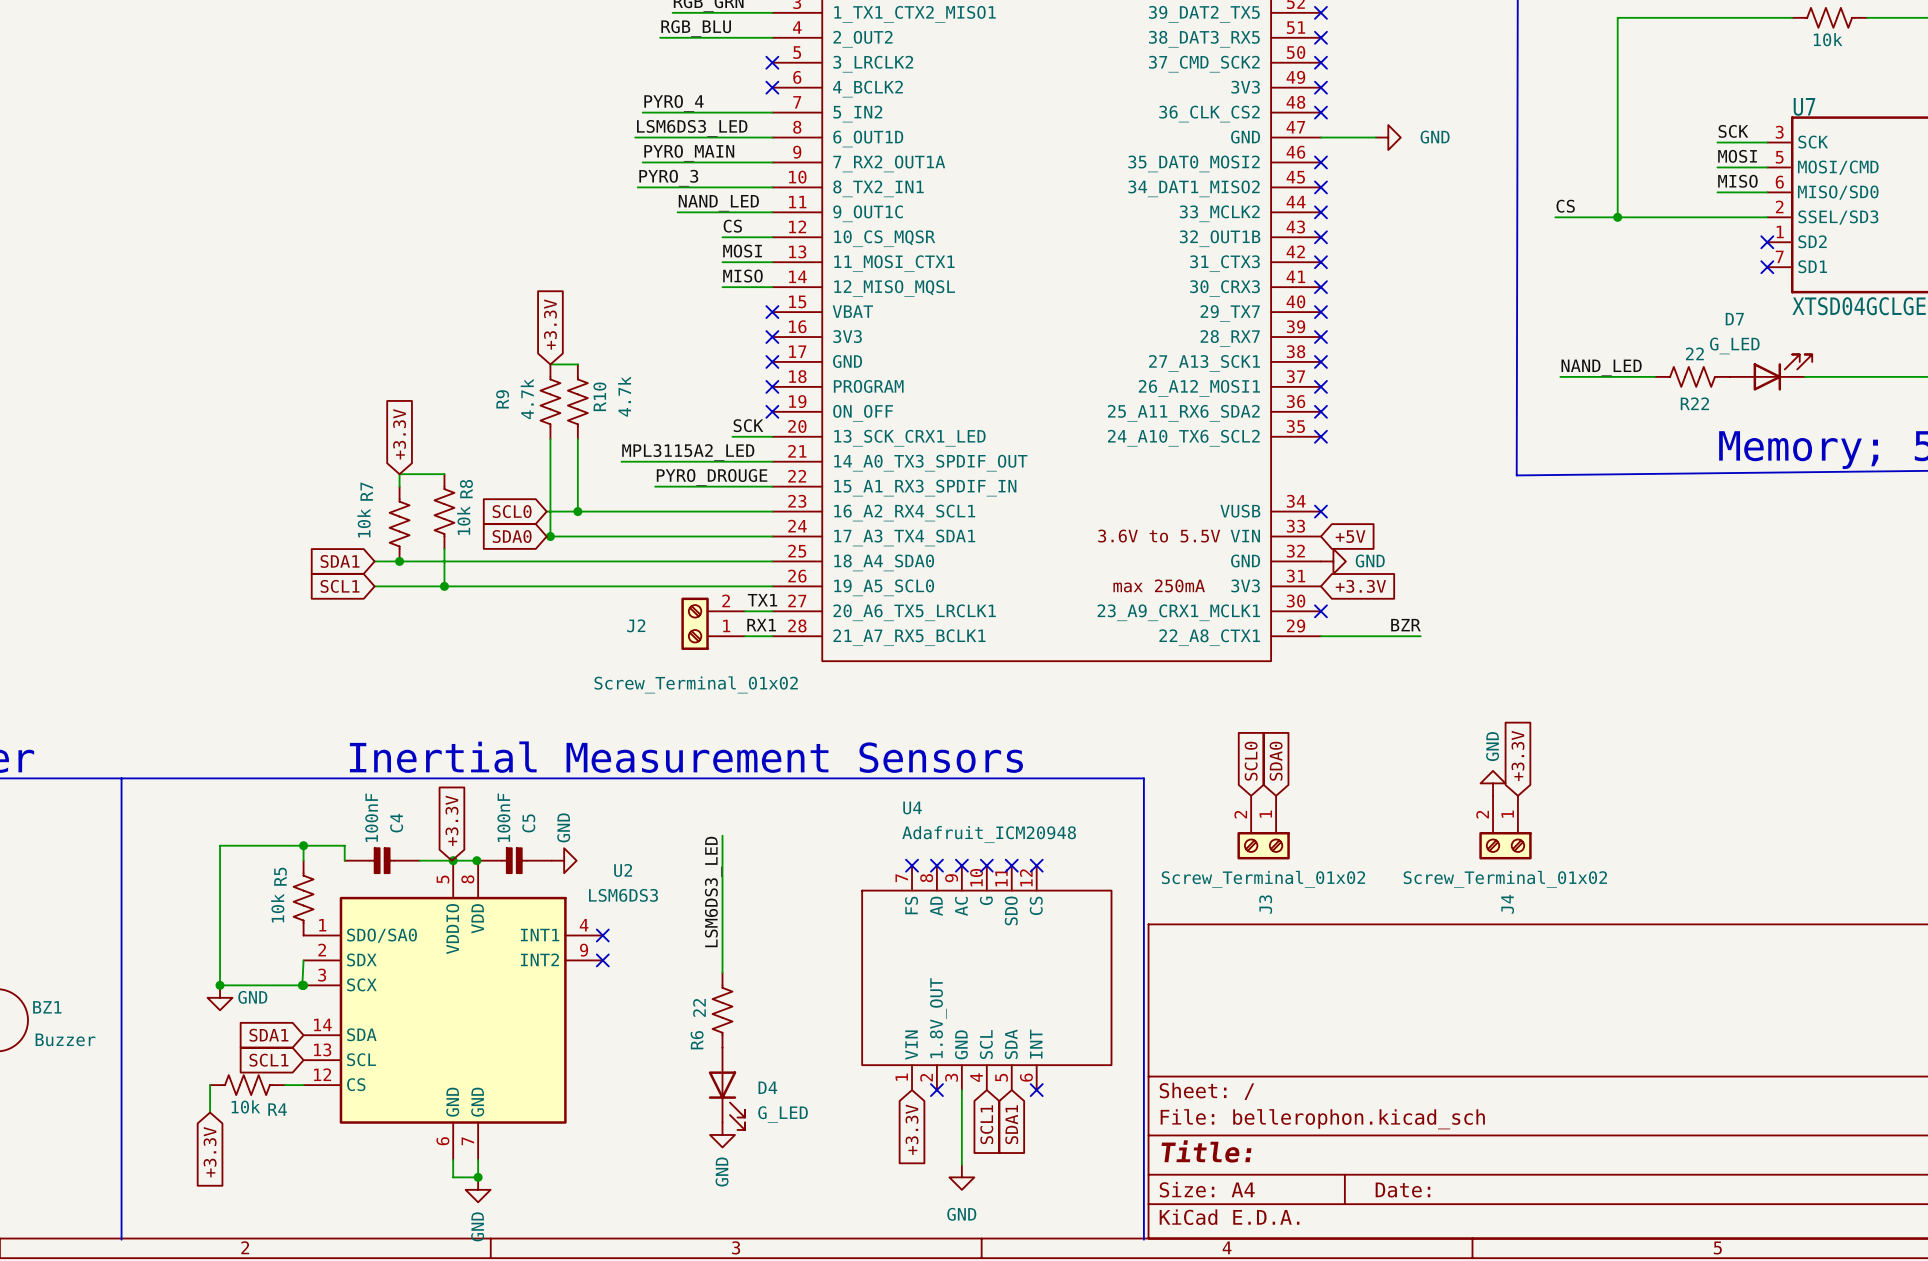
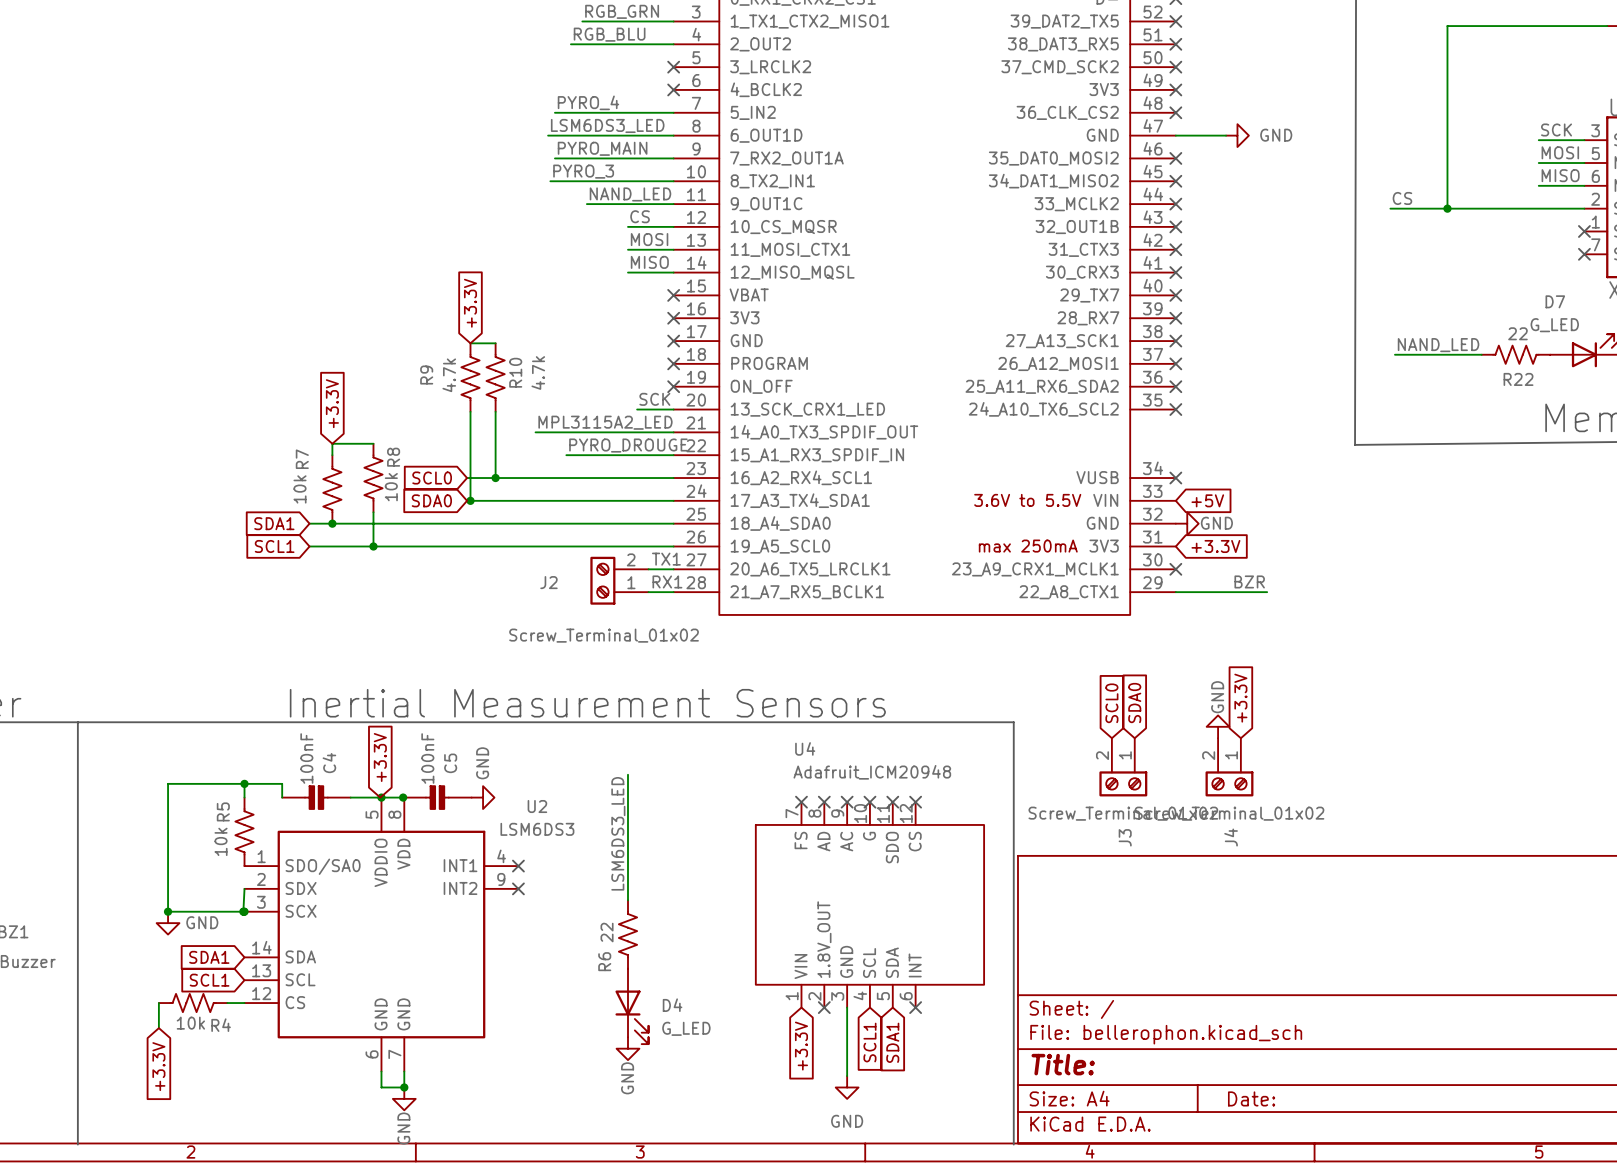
global label position: +3.3V (1517, 755) -> +3.3V (1240, 698)
power symbol position: GND (1493, 783) -> GND (1218, 726)
J4 position: (1505, 827) -> (1229, 767)

